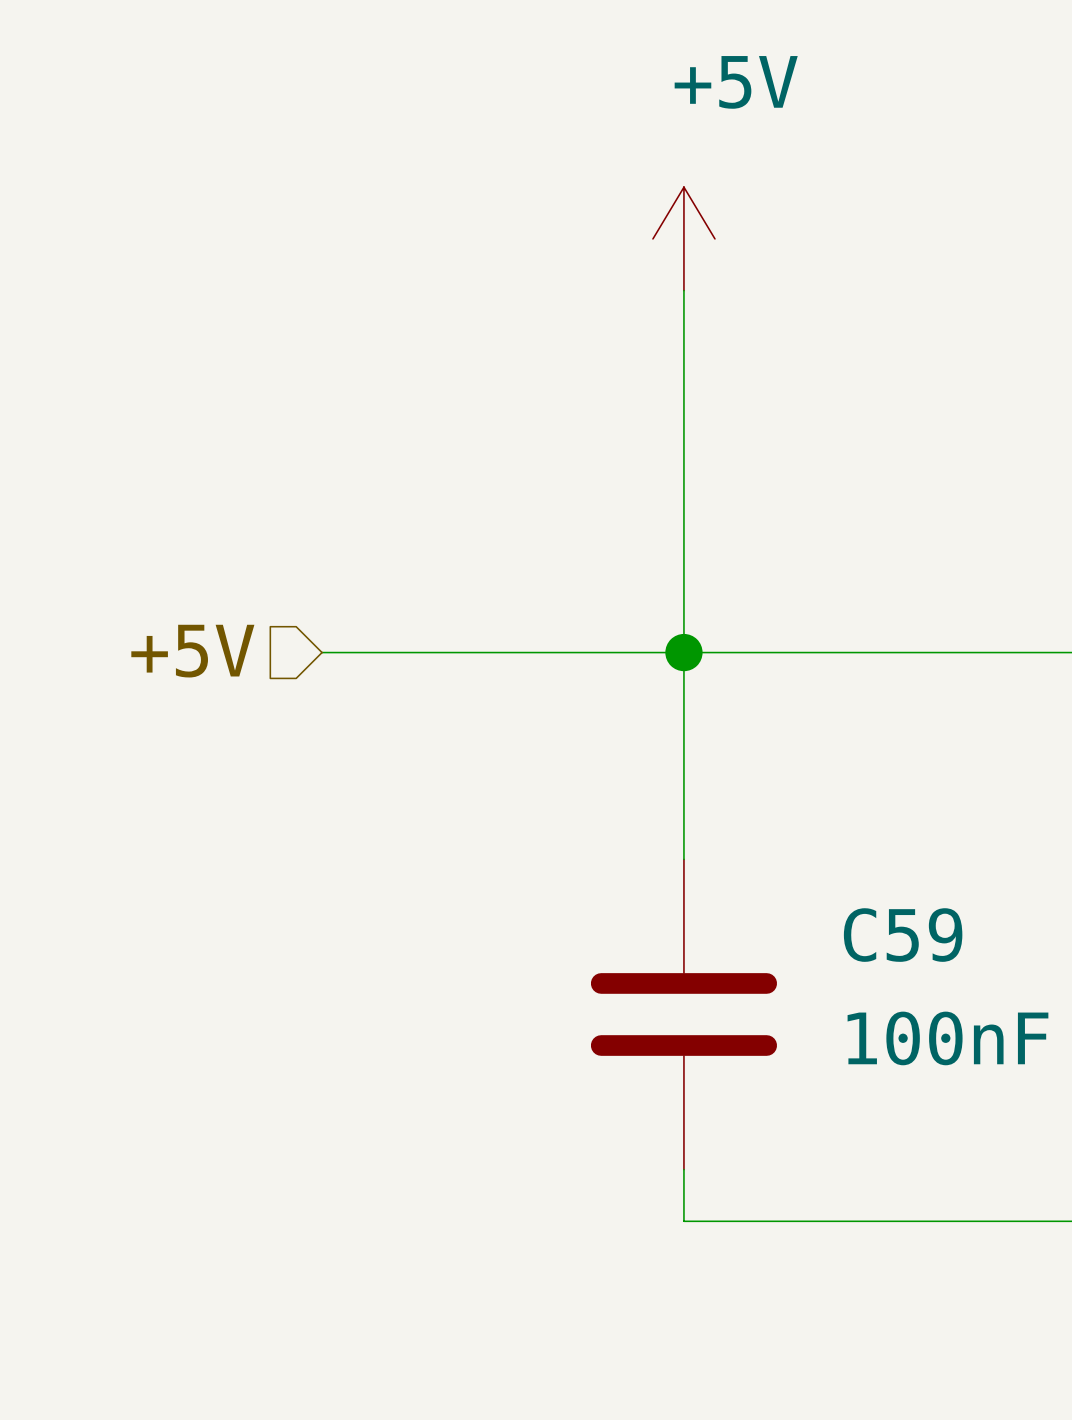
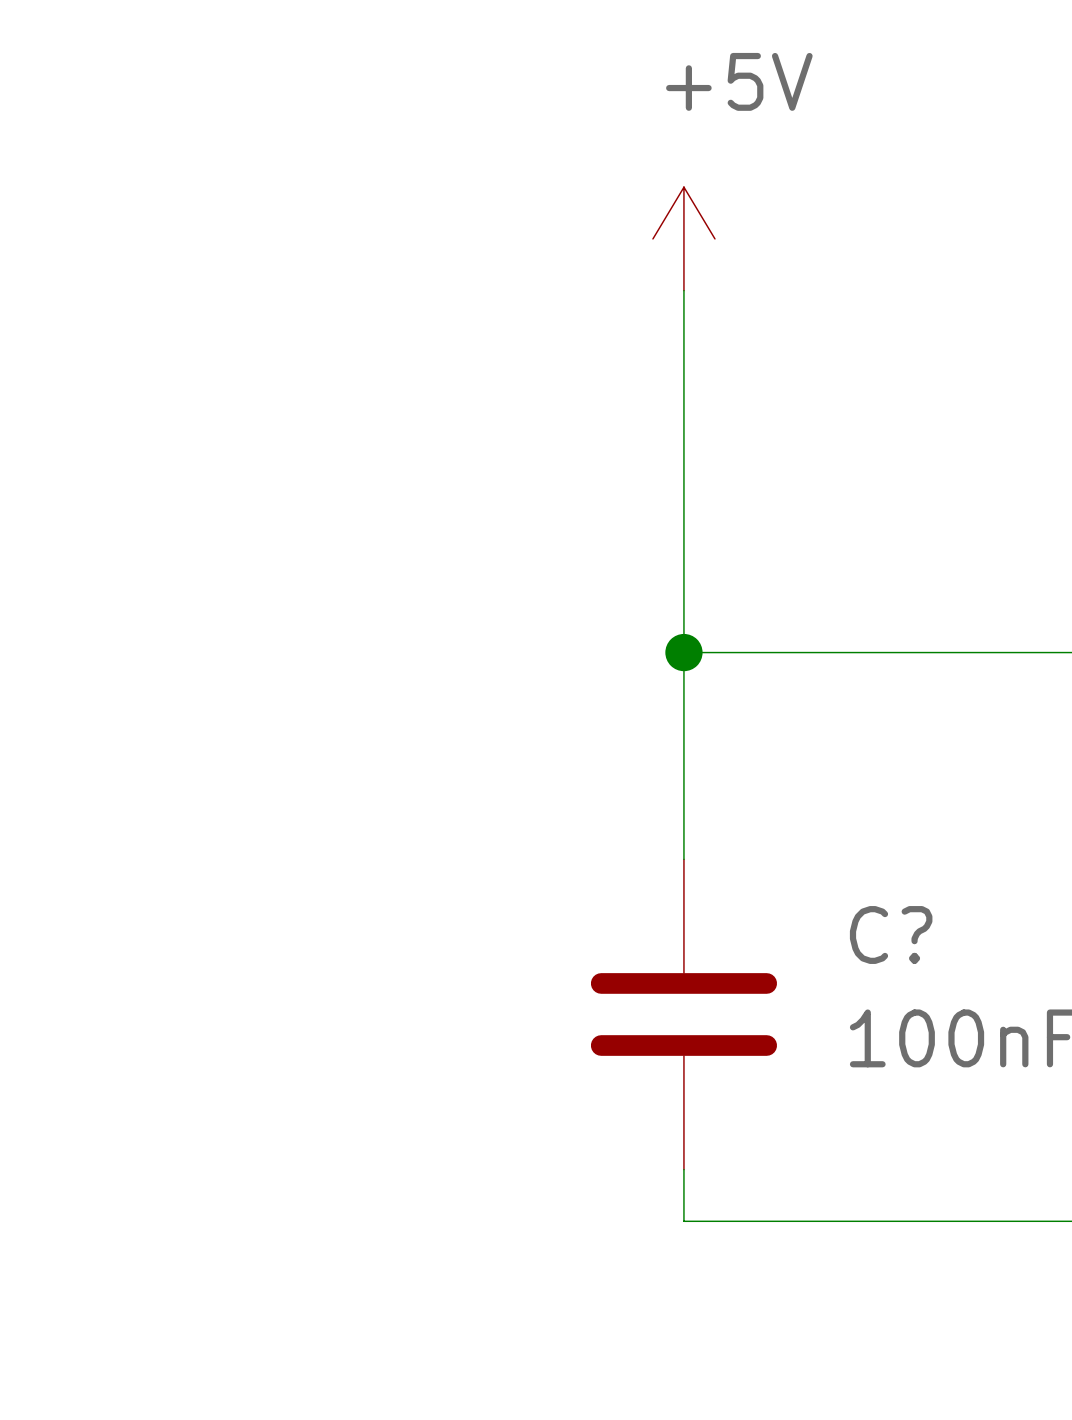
hierarchical label: +5V (192, 651) -> none
wire: (322, 652) (683, 652) -> none
C59 name: C59 (903, 935) -> C? (891, 935)

